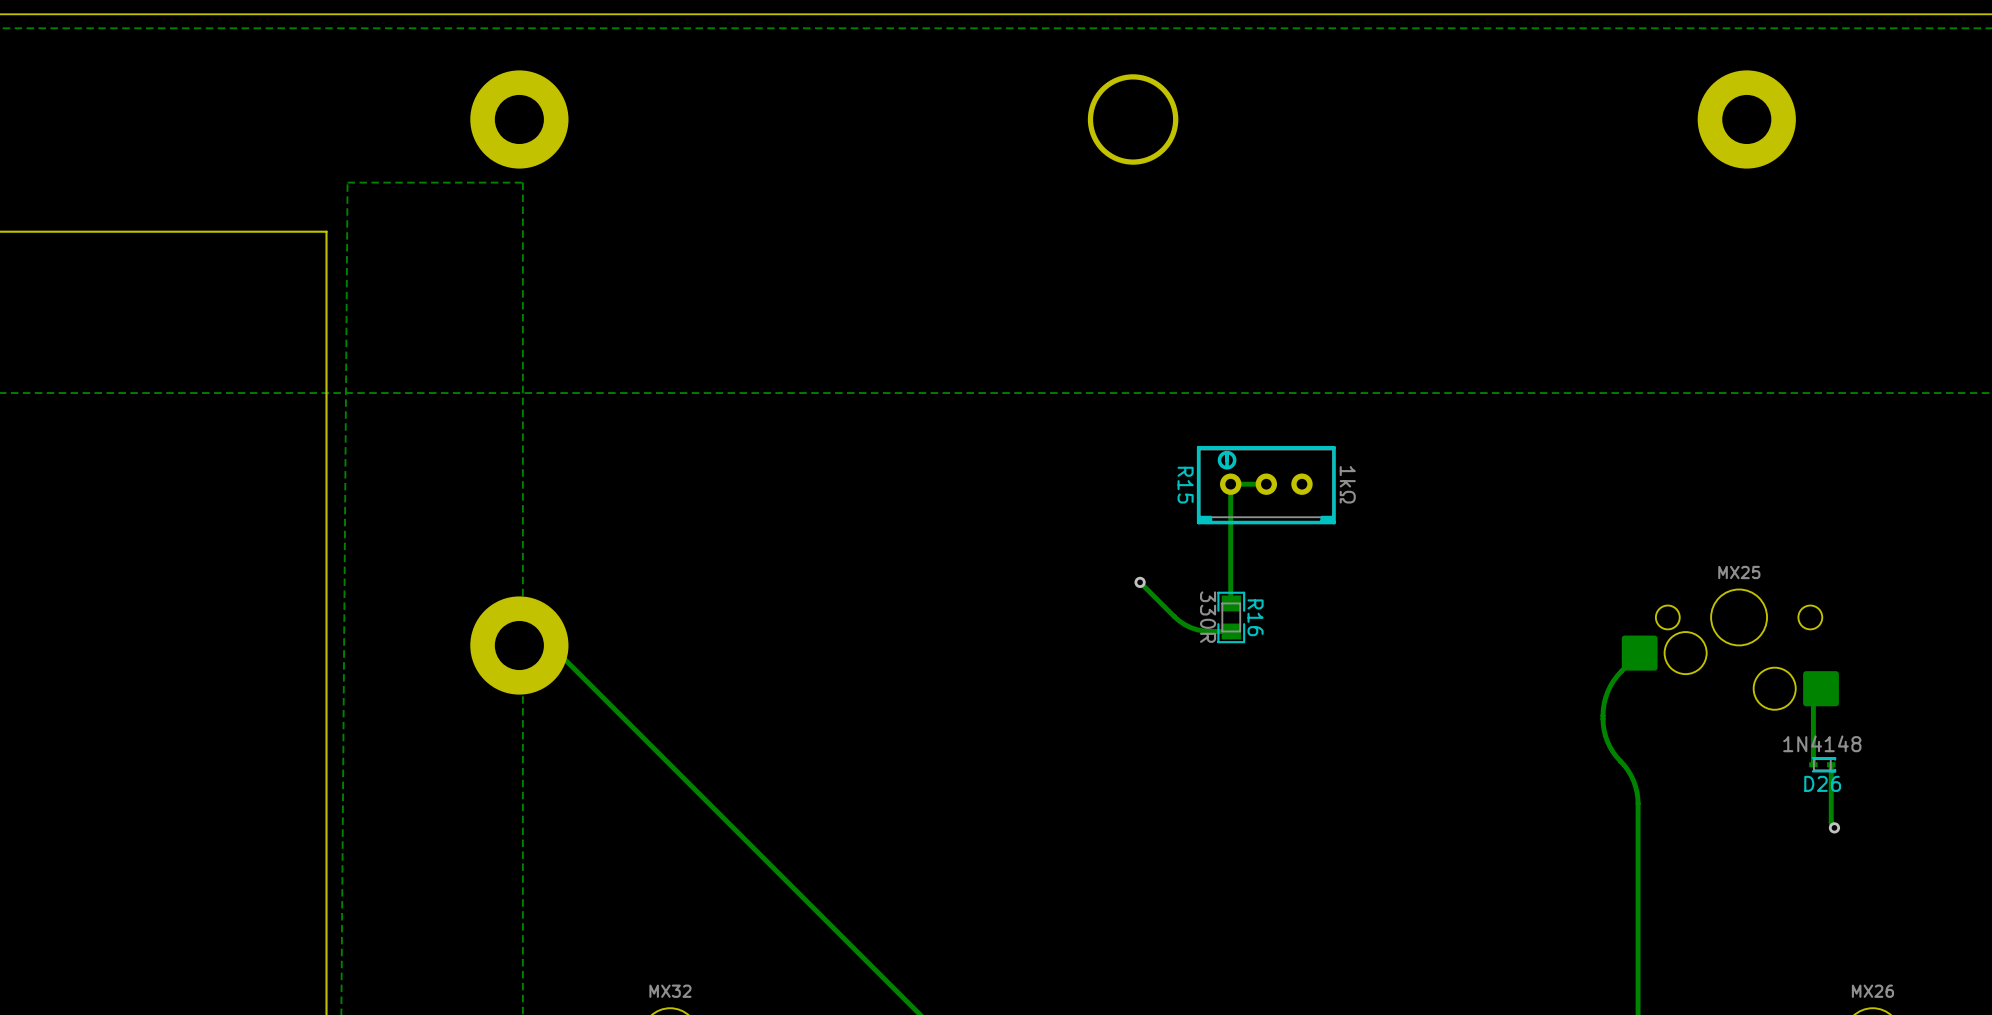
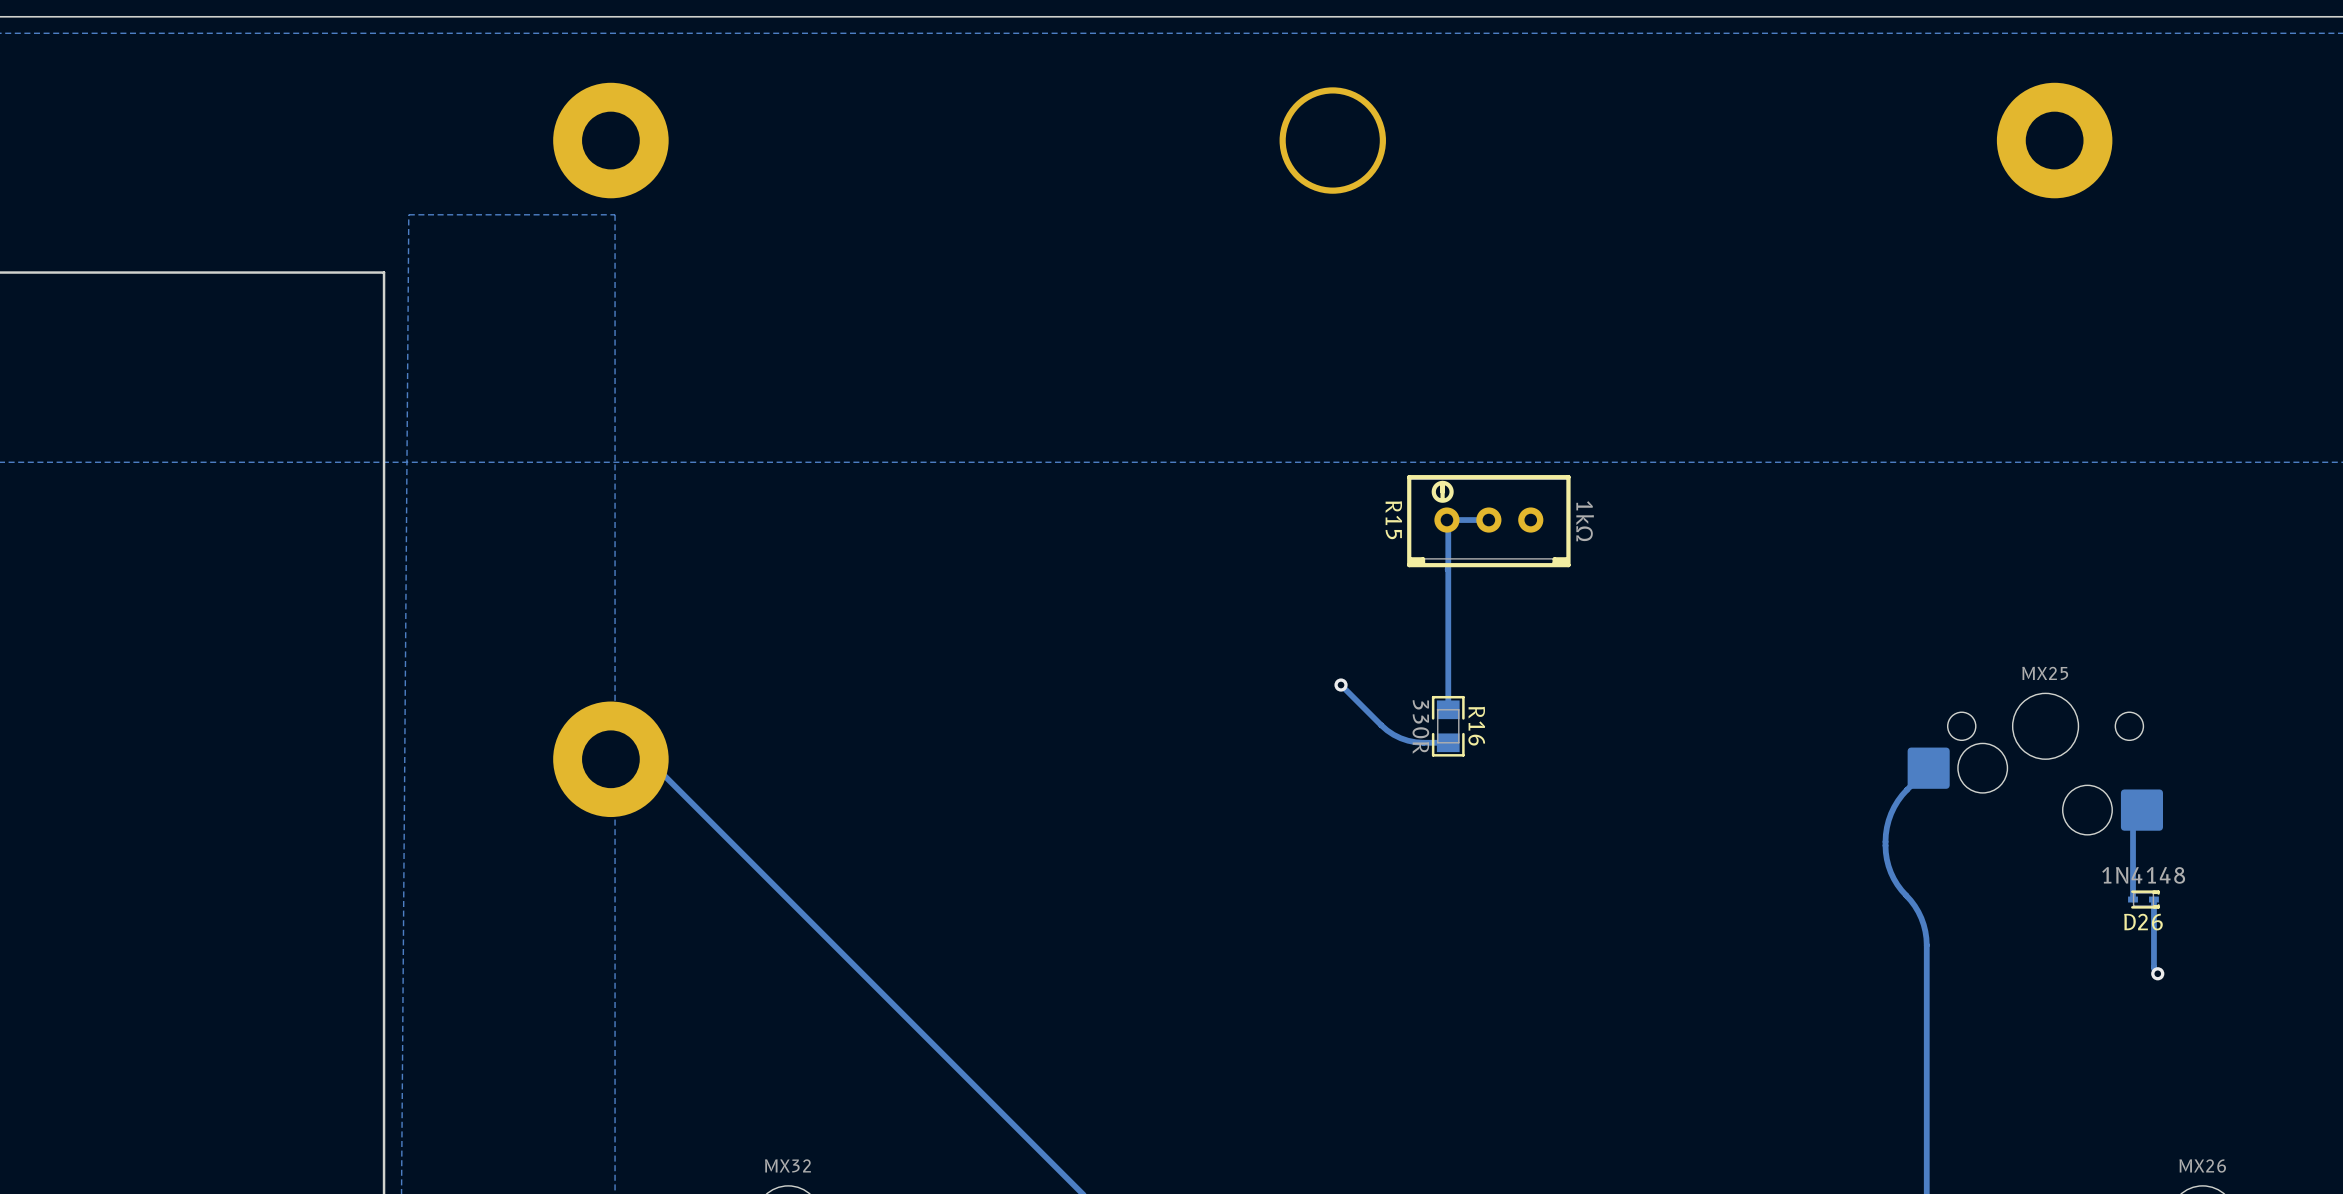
track: (1266, 484) (1230, 484) (1231, 603) -> (1488, 520) (1446, 520) (1448, 709)
R15 position: (1266, 485) -> (1488, 521)

